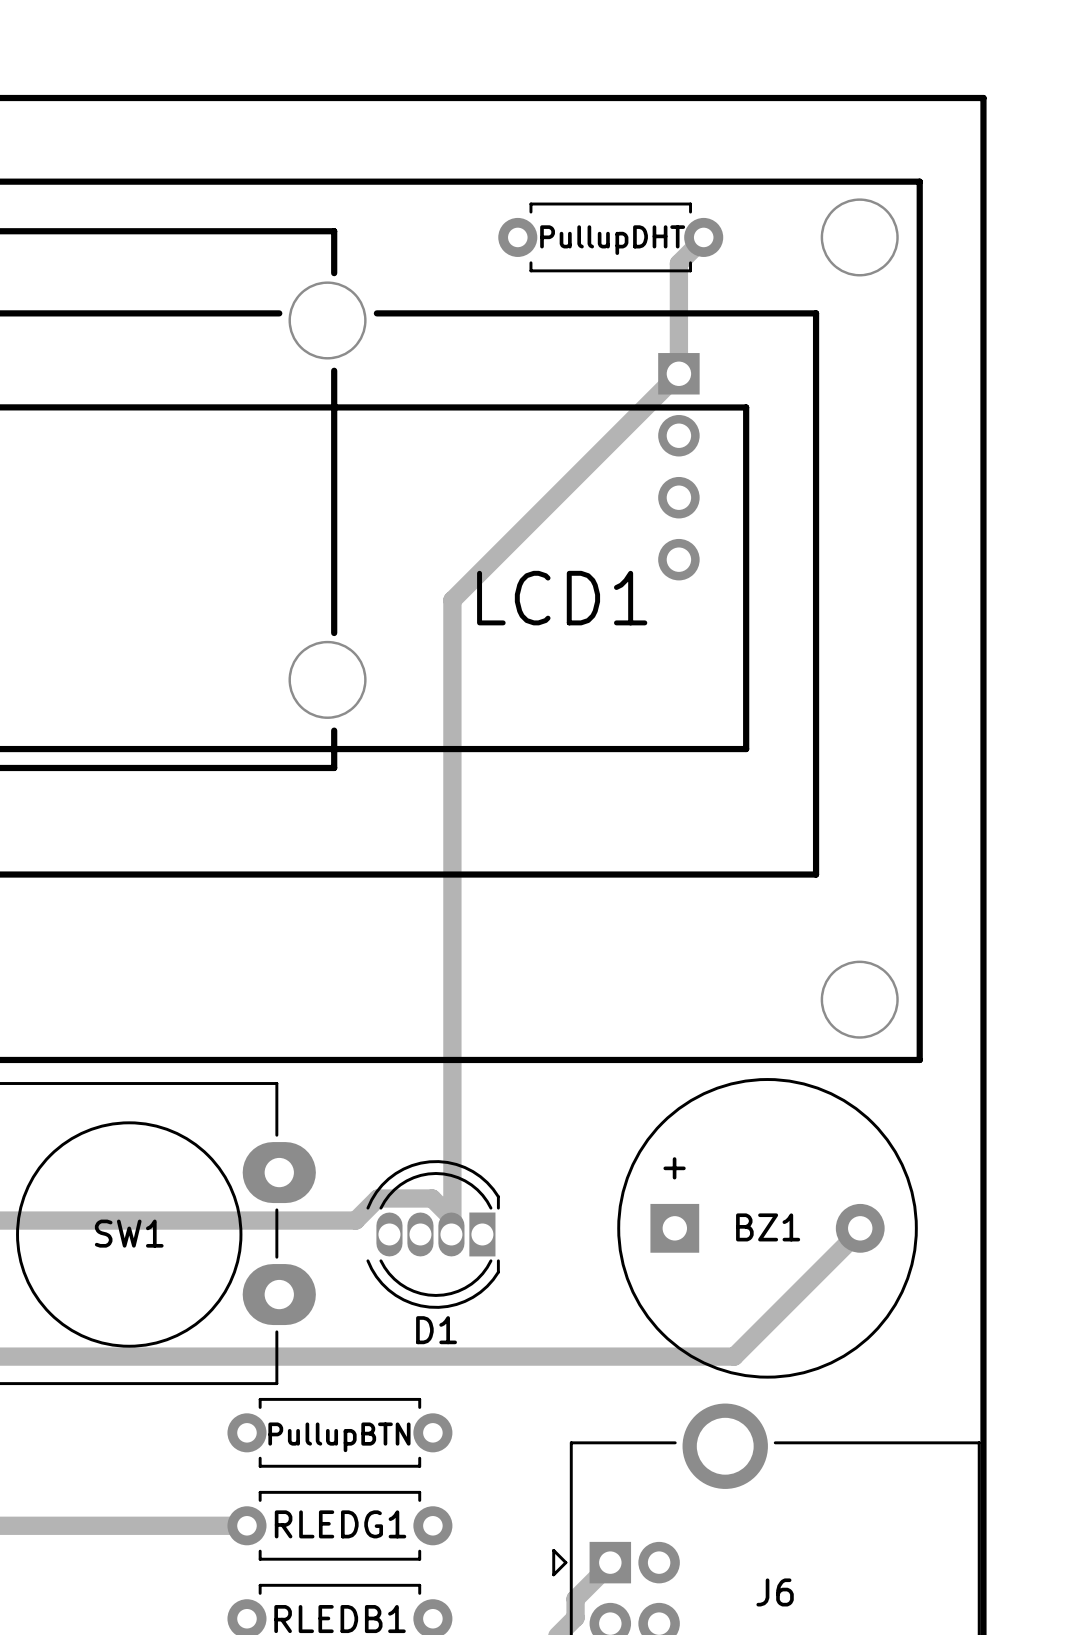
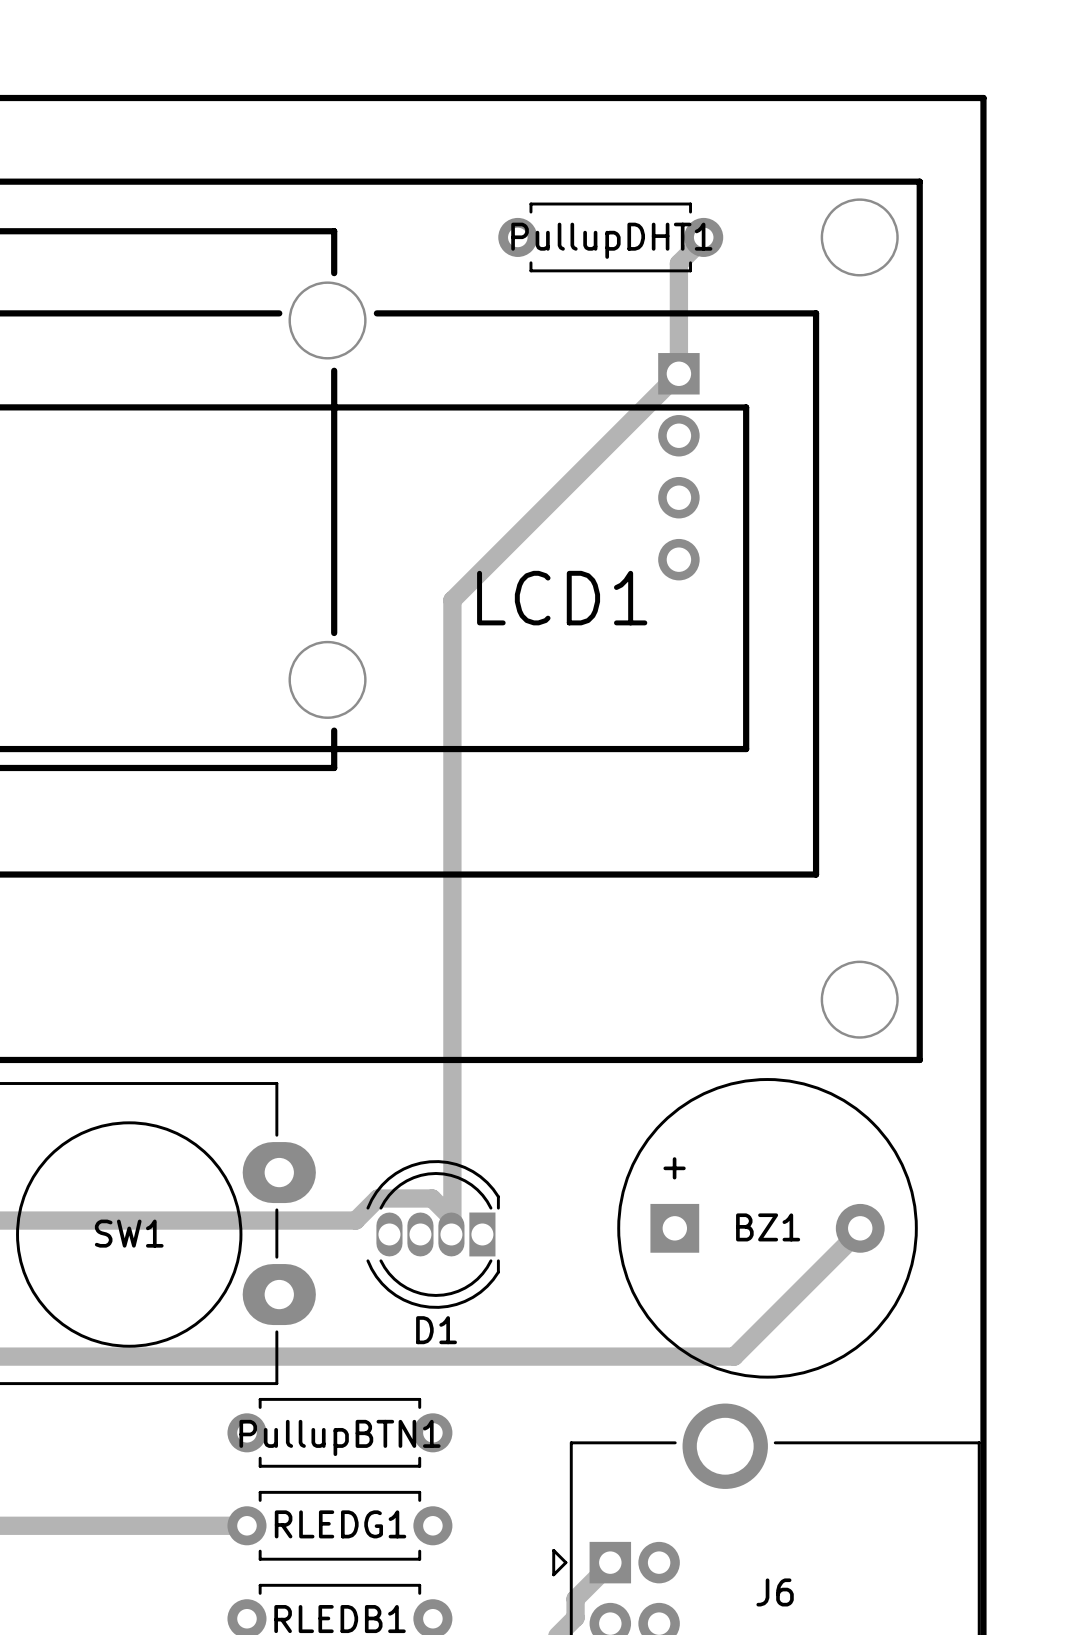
PullupDHT name: PullupDHT (612, 240) -> PullupDHT1 (611, 240)
PullupBTN name: PullupBTN (339, 1437) -> PullupBTN1 (340, 1437)

